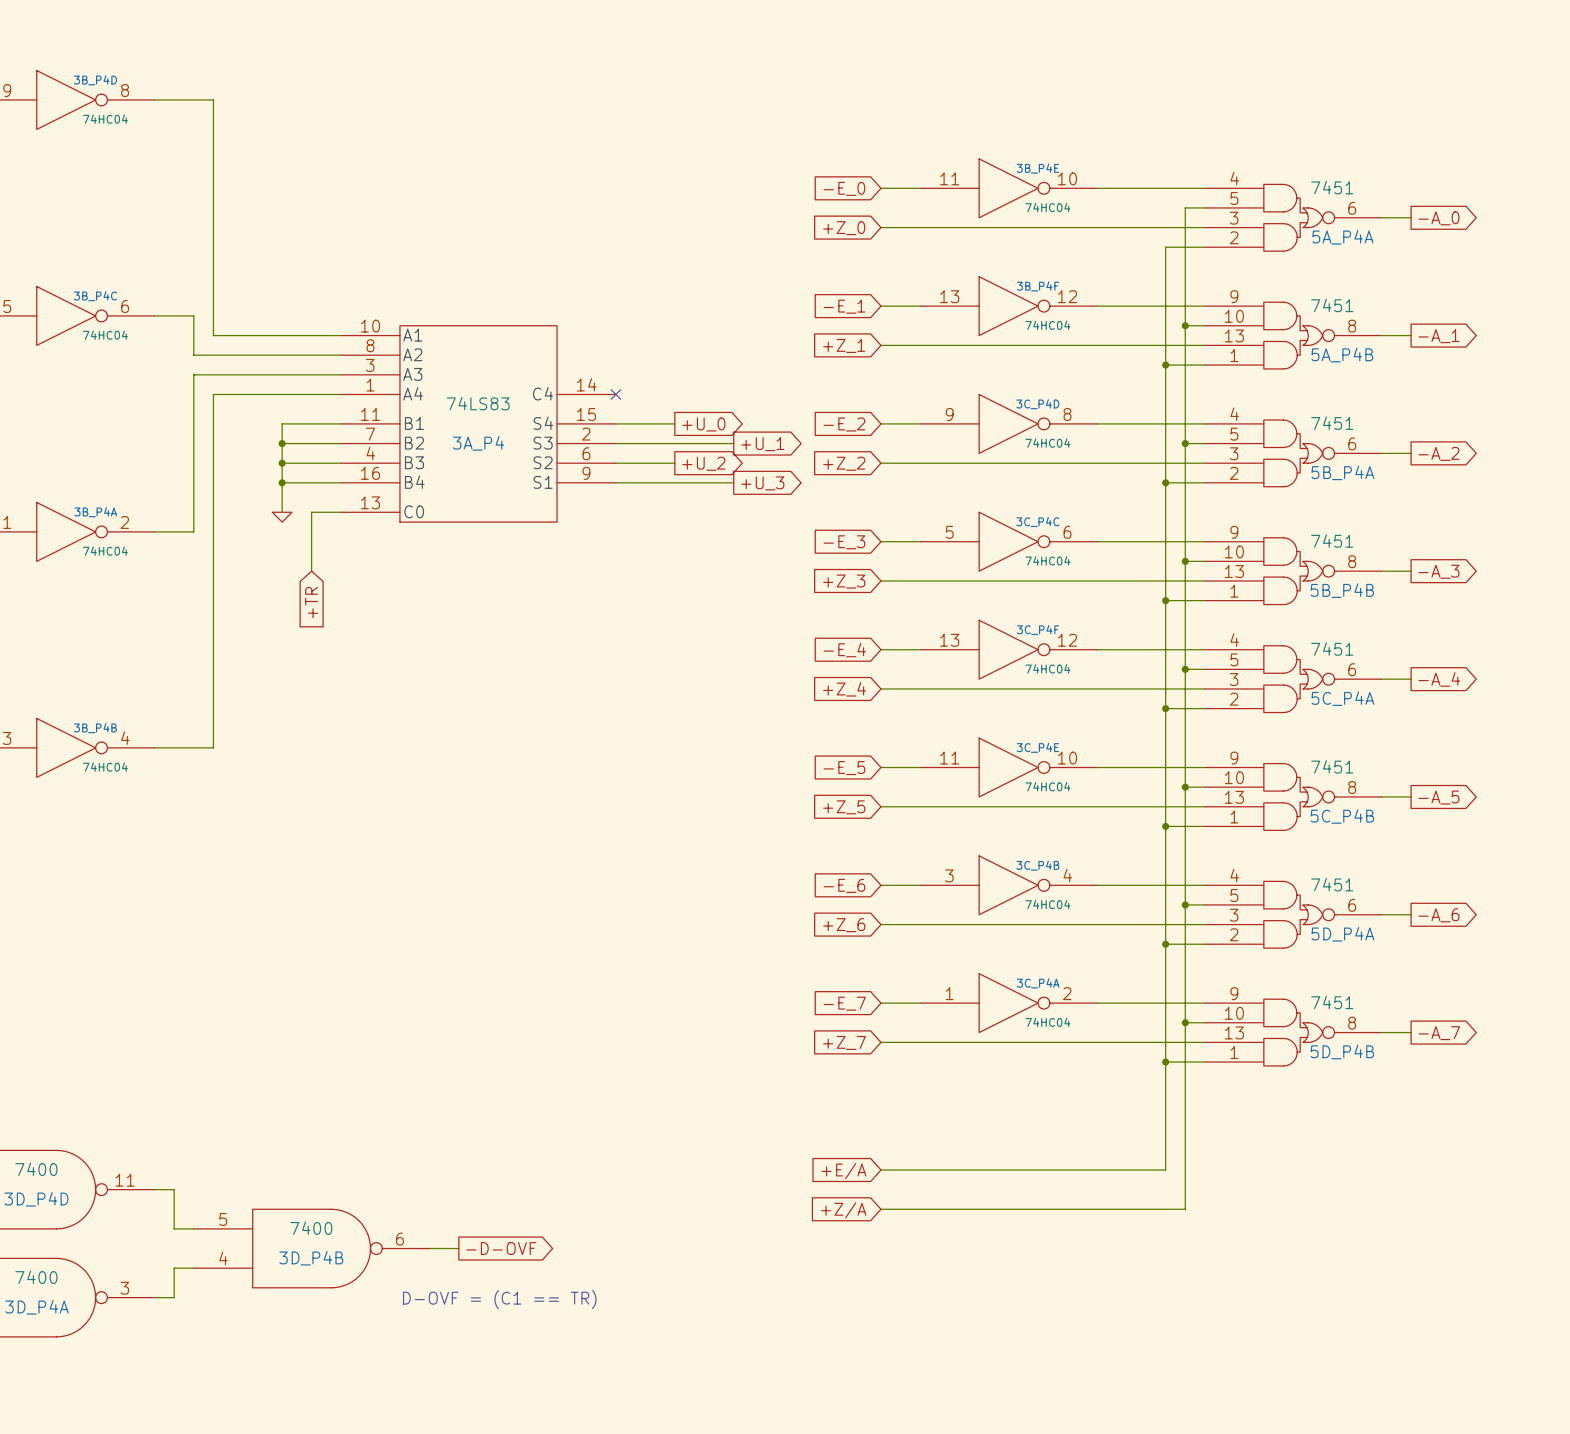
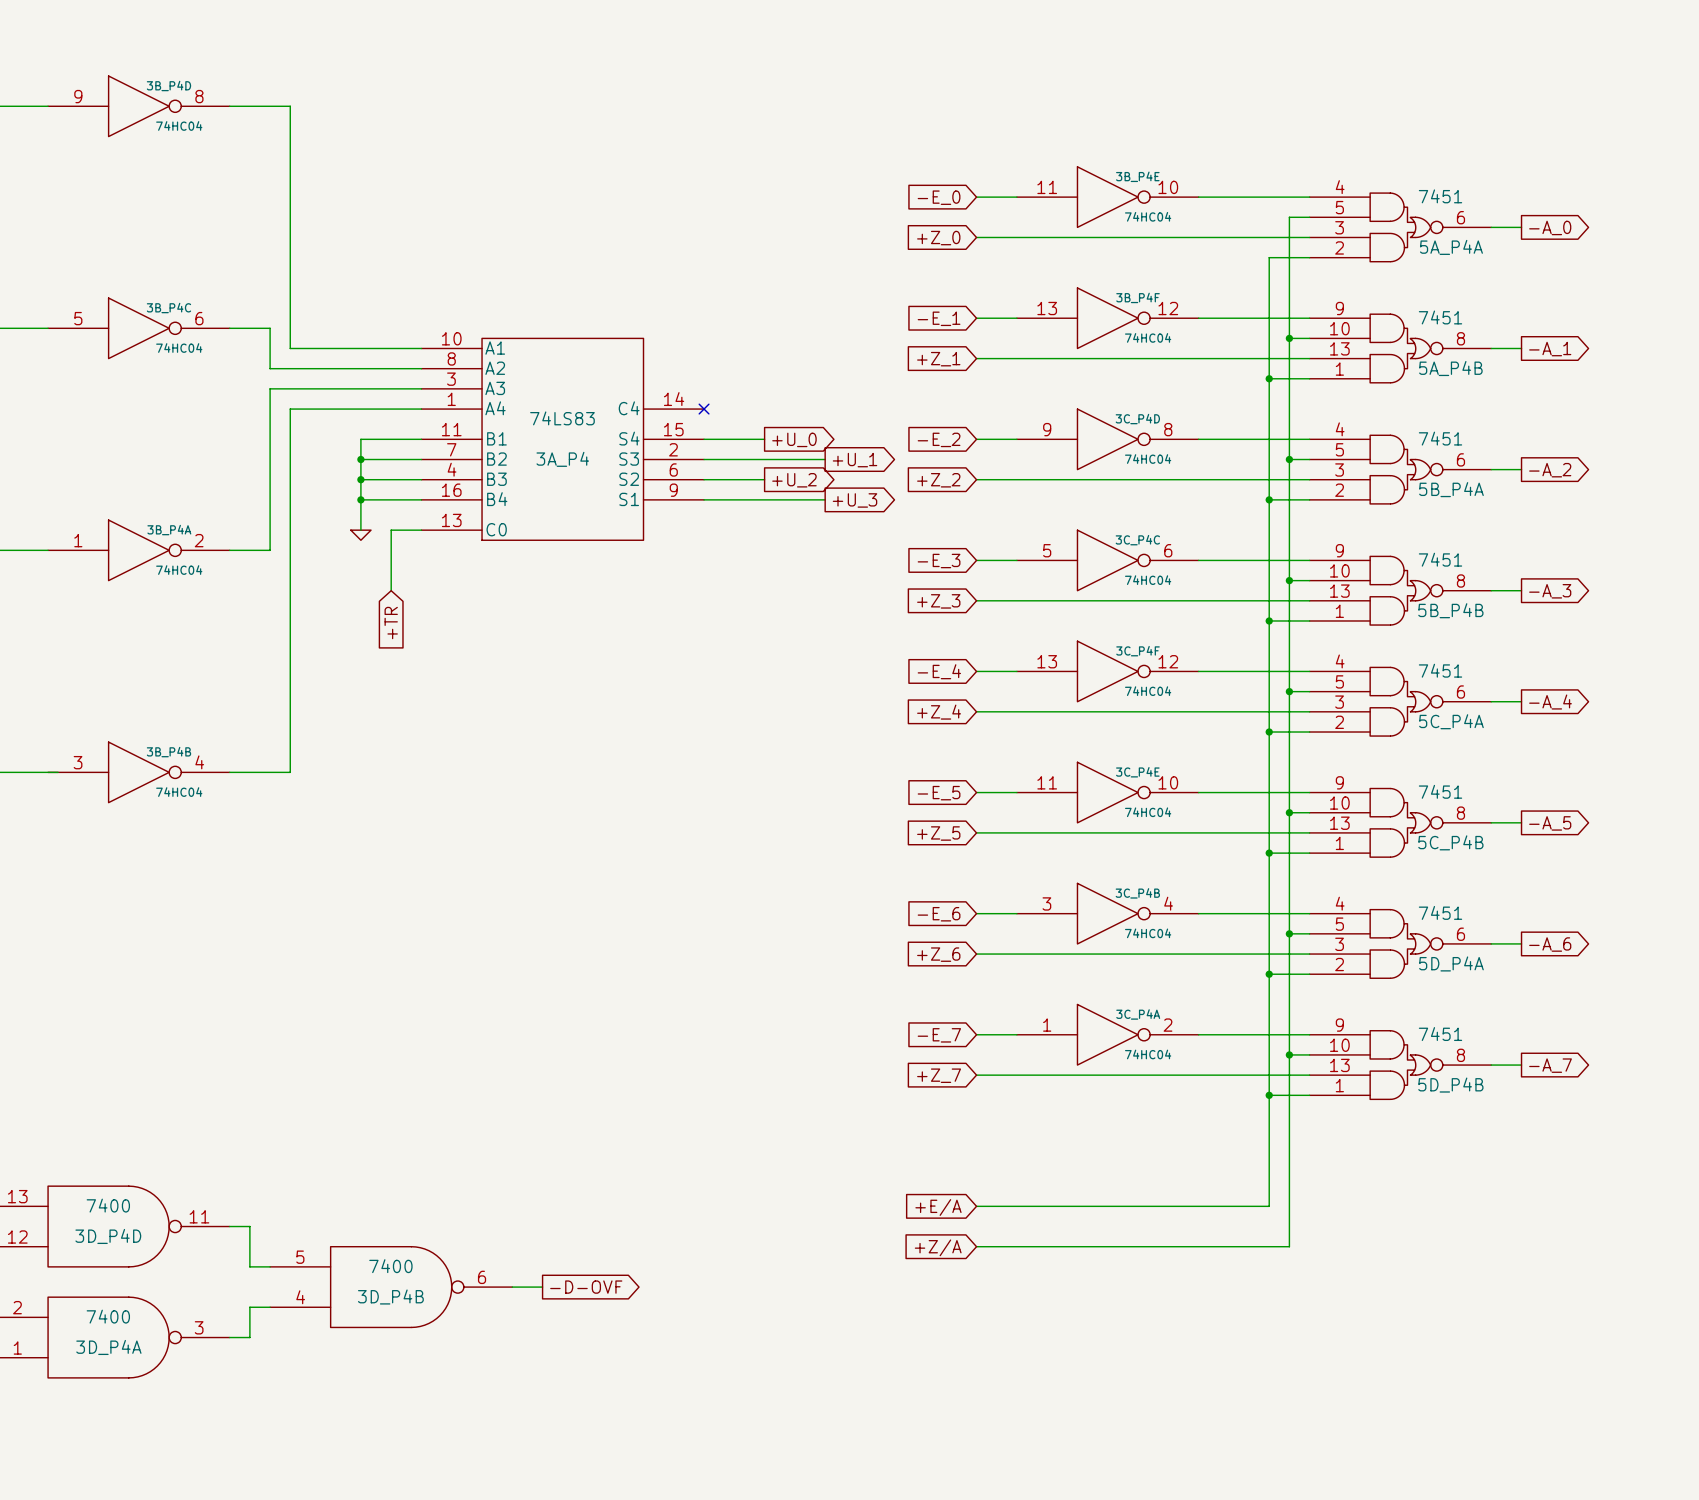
text: D-OVF = (C1 == TR) (499, 1299) -> none

